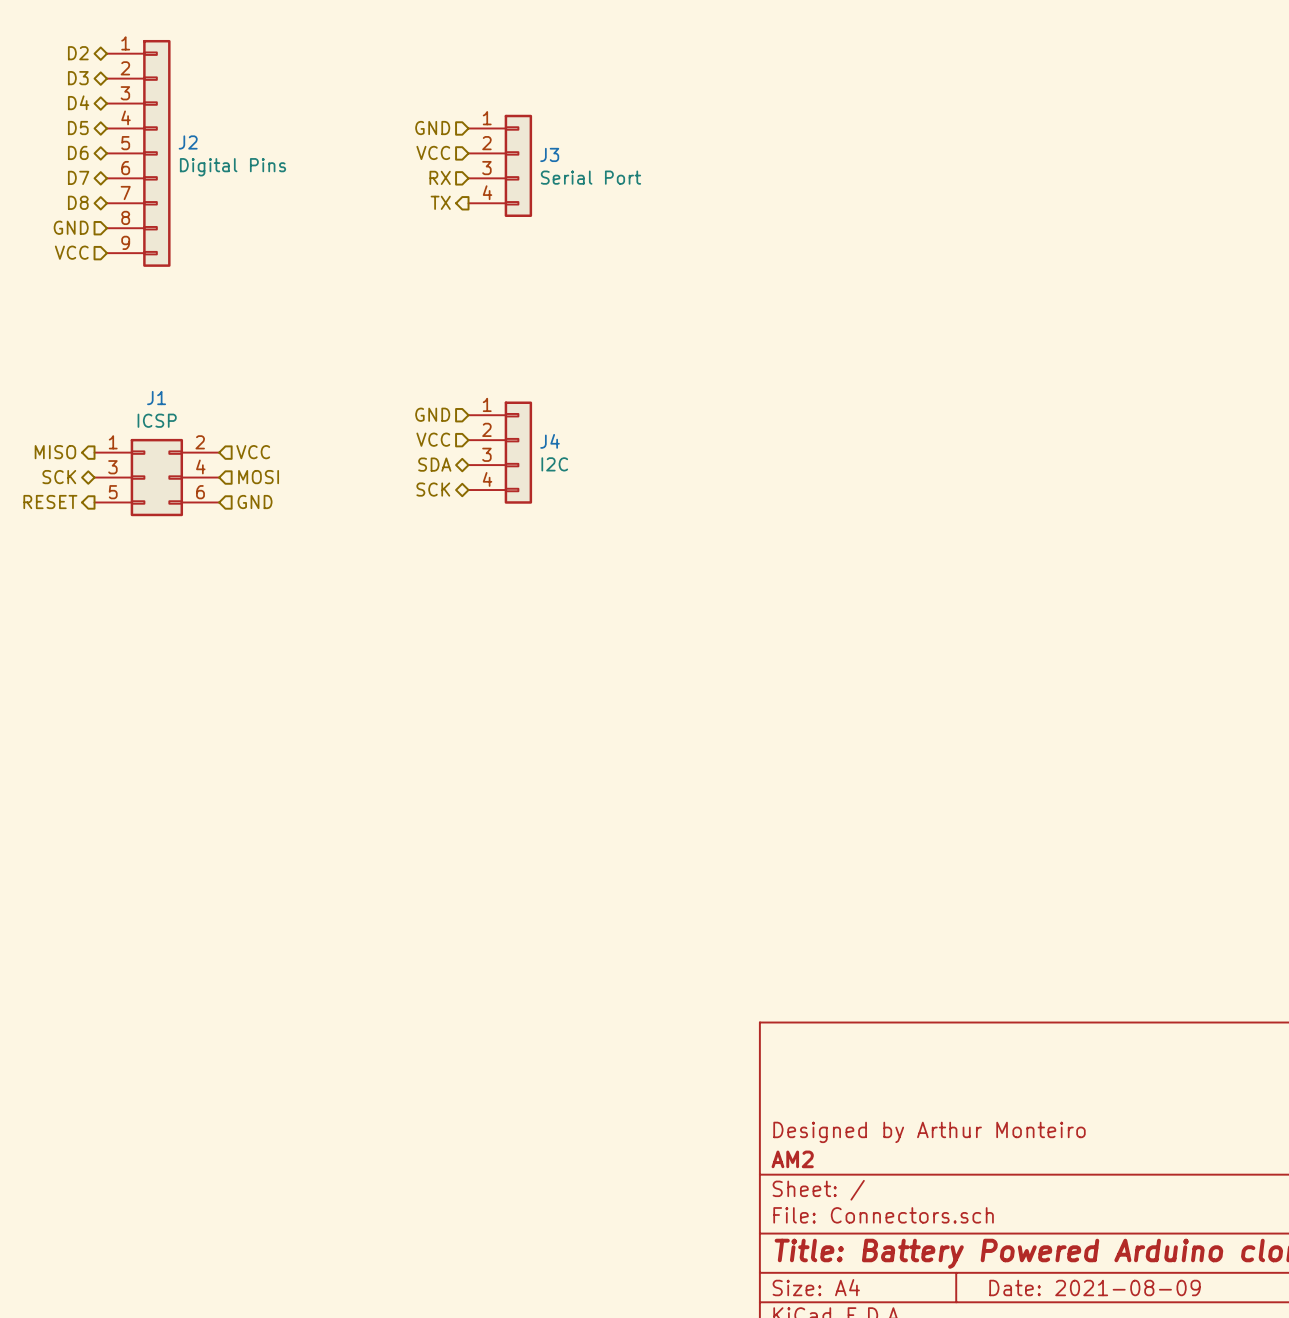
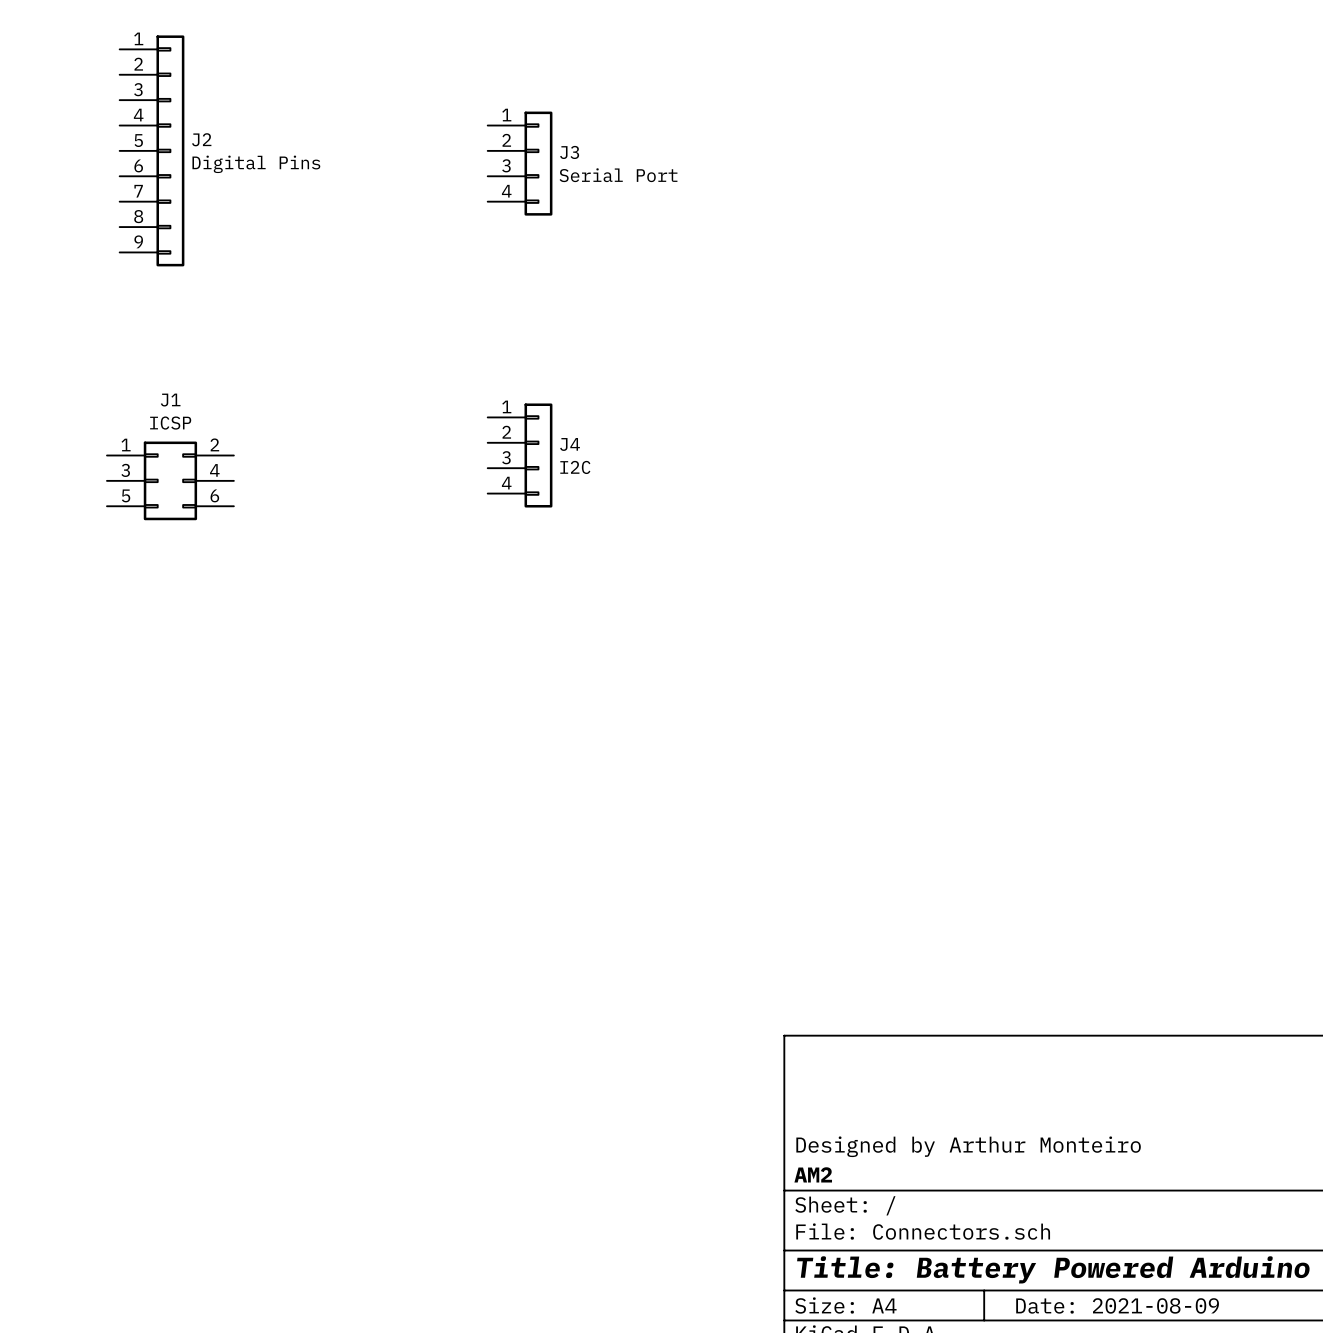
hierarchical label: D2 (78, 53) -> none
hierarchical label: D3 (78, 78) -> none
hierarchical label: D4 (78, 102) -> none
hierarchical label: D5 (78, 128) -> none
hierarchical label: GND (432, 128) -> none
hierarchical label: D6 (78, 152) -> none
hierarchical label: VCC (433, 152) -> none
hierarchical label: D7 (78, 177) -> none
hierarchical label: RX (440, 177) -> none
hierarchical label: D8 (78, 202) -> none
hierarchical label: TX (440, 202) -> none
hierarchical label: GND (71, 227) -> none
hierarchical label: VCC (71, 252) -> none
hierarchical label: GND (432, 414) -> none
hierarchical label: VCC (433, 439) -> none
hierarchical label: MISO (55, 452) -> none
hierarchical label: VCC (253, 452) -> none
hierarchical label: SDA (434, 464) -> none
hierarchical label: SCK (59, 477) -> none
hierarchical label: MOSI (258, 477) -> none
hierarchical label: SCK (433, 489) -> none
hierarchical label: RESET (50, 502) -> none
hierarchical label: GND (255, 502) -> none

